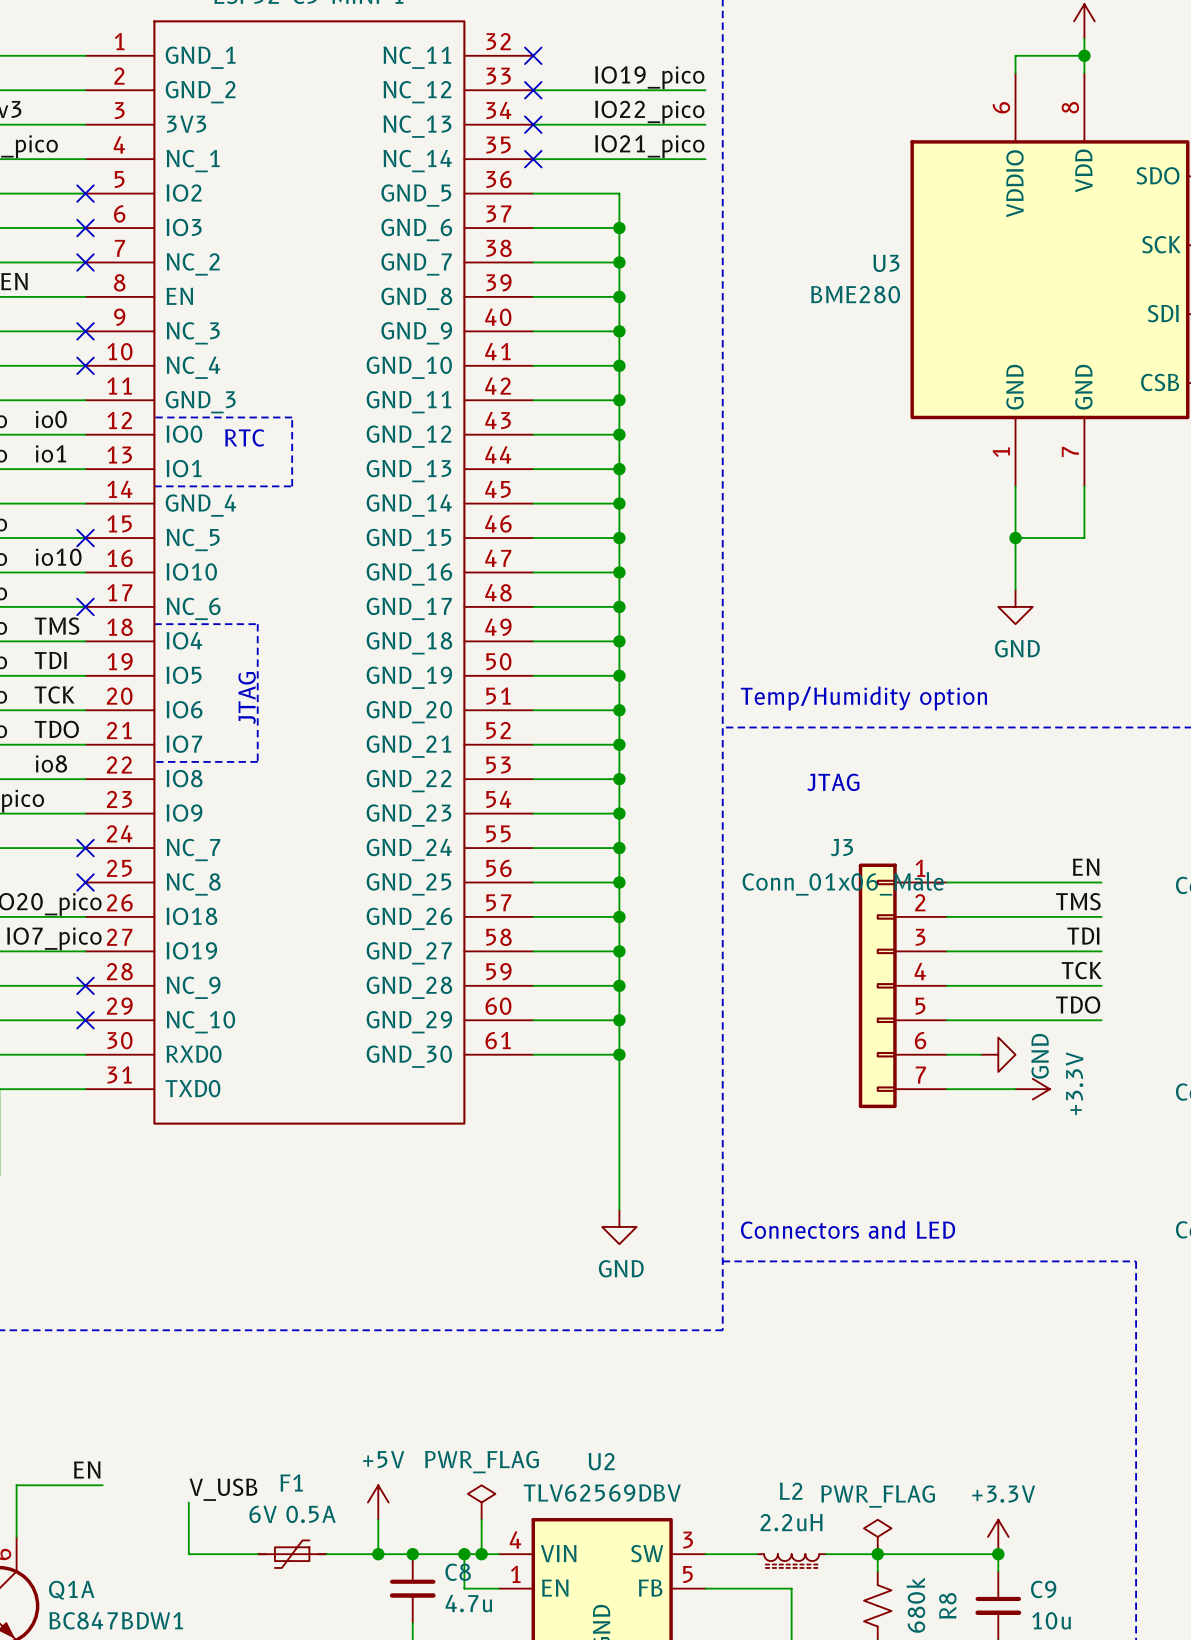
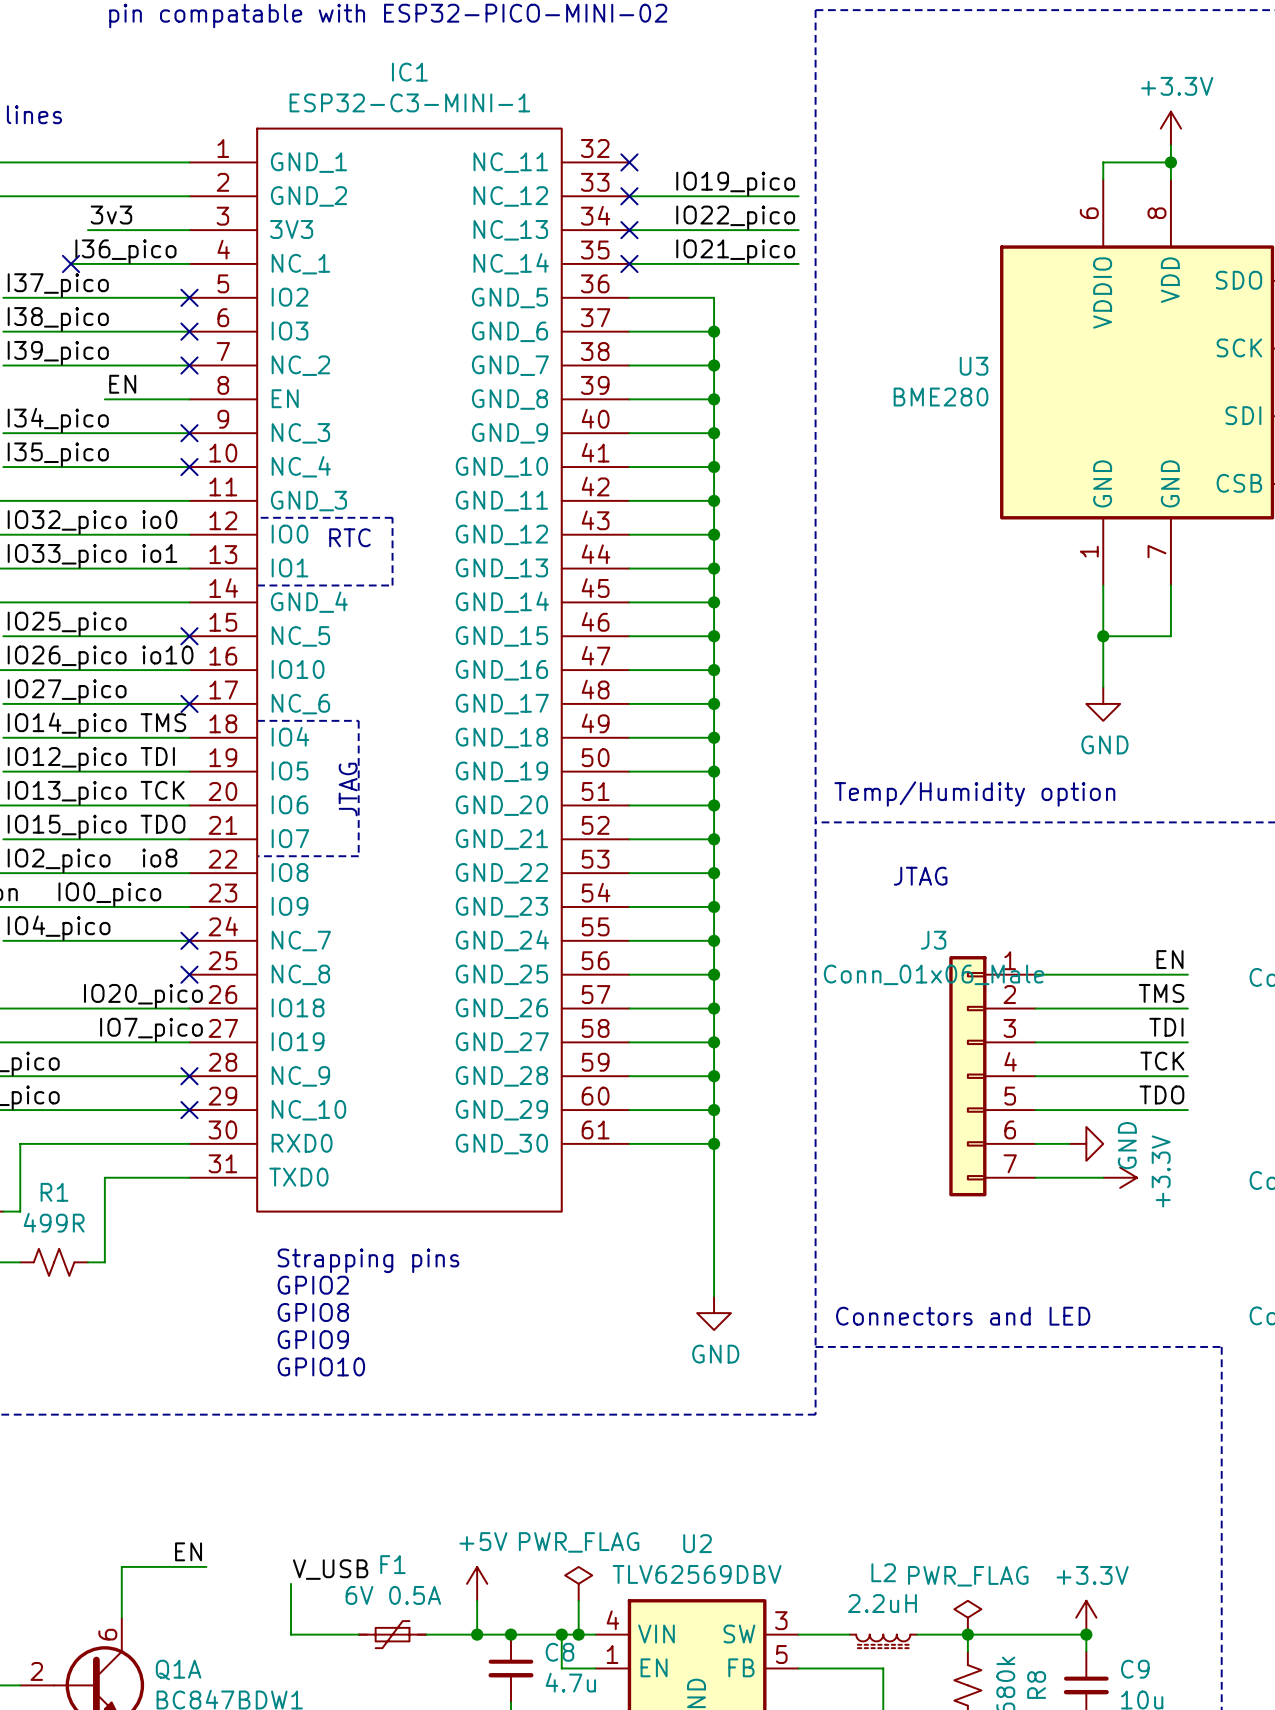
text: none -> Strapping pins (368, 1260)
text: none -> GPIO2 (313, 1285)
text: none -> GPIO8 (313, 1312)
text: none -> GPIO9 (313, 1339)
text: none -> GPIO10 (321, 1366)

